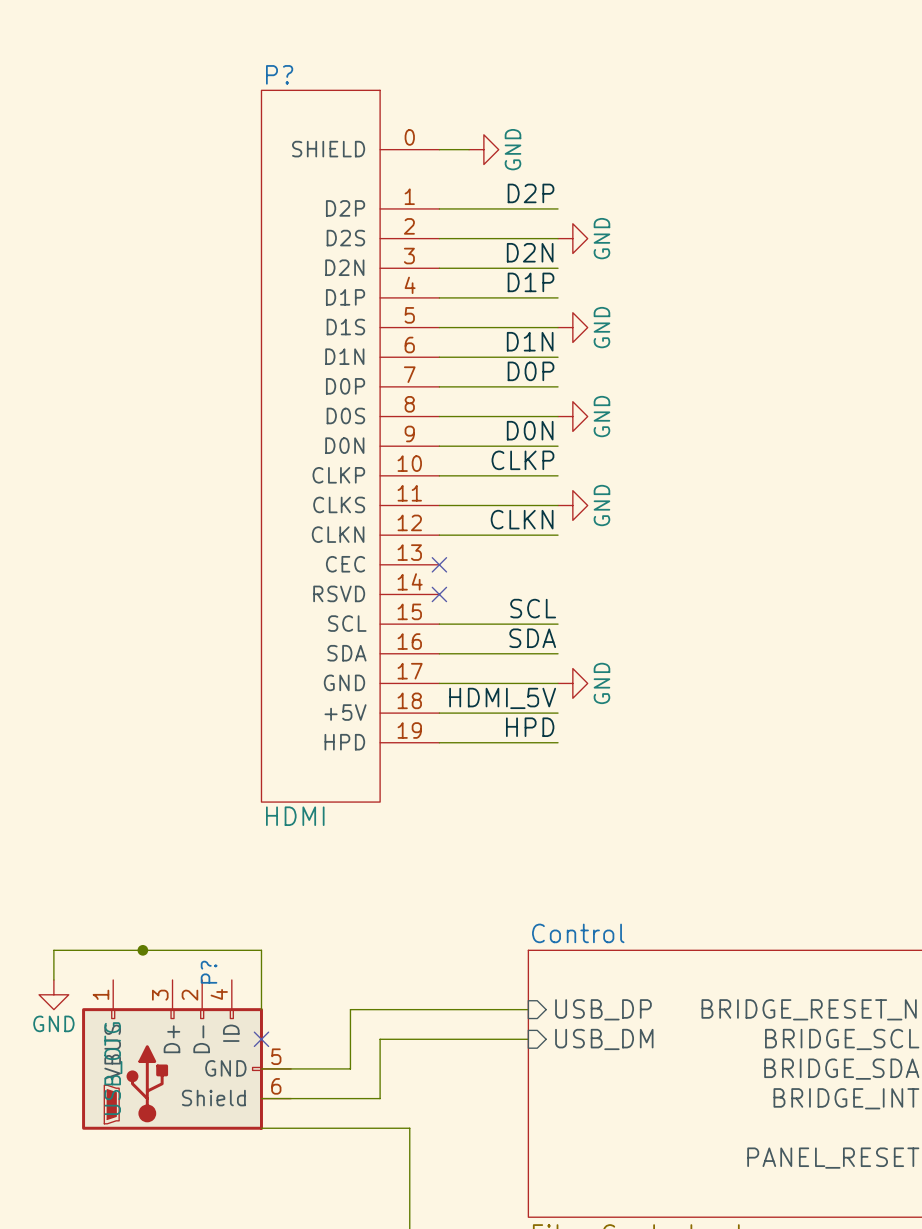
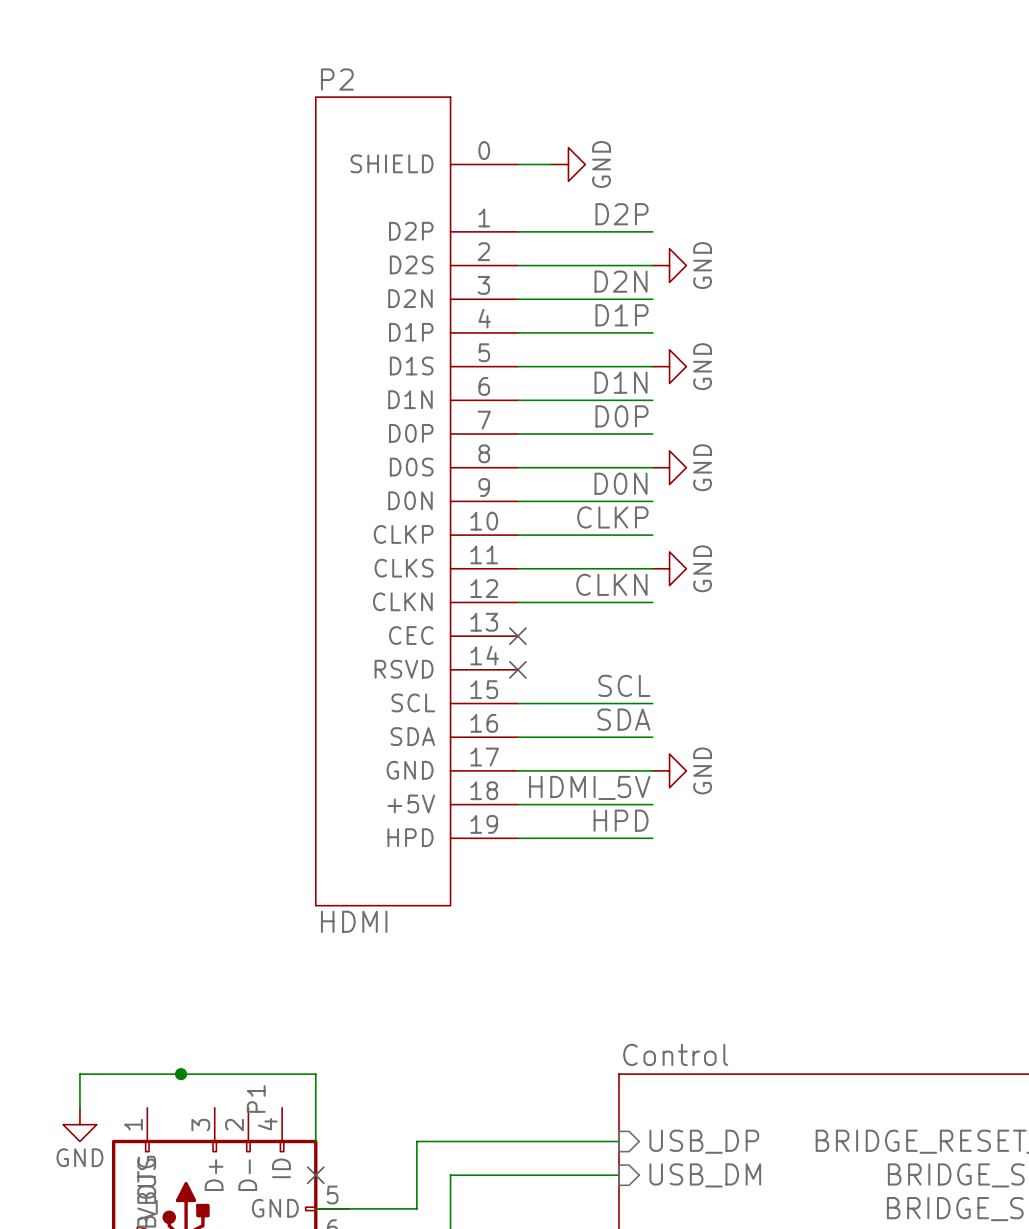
P? name: P? (279, 74) -> P2 (337, 79)
P? name: P? (209, 972) -> P1 (256, 1099)

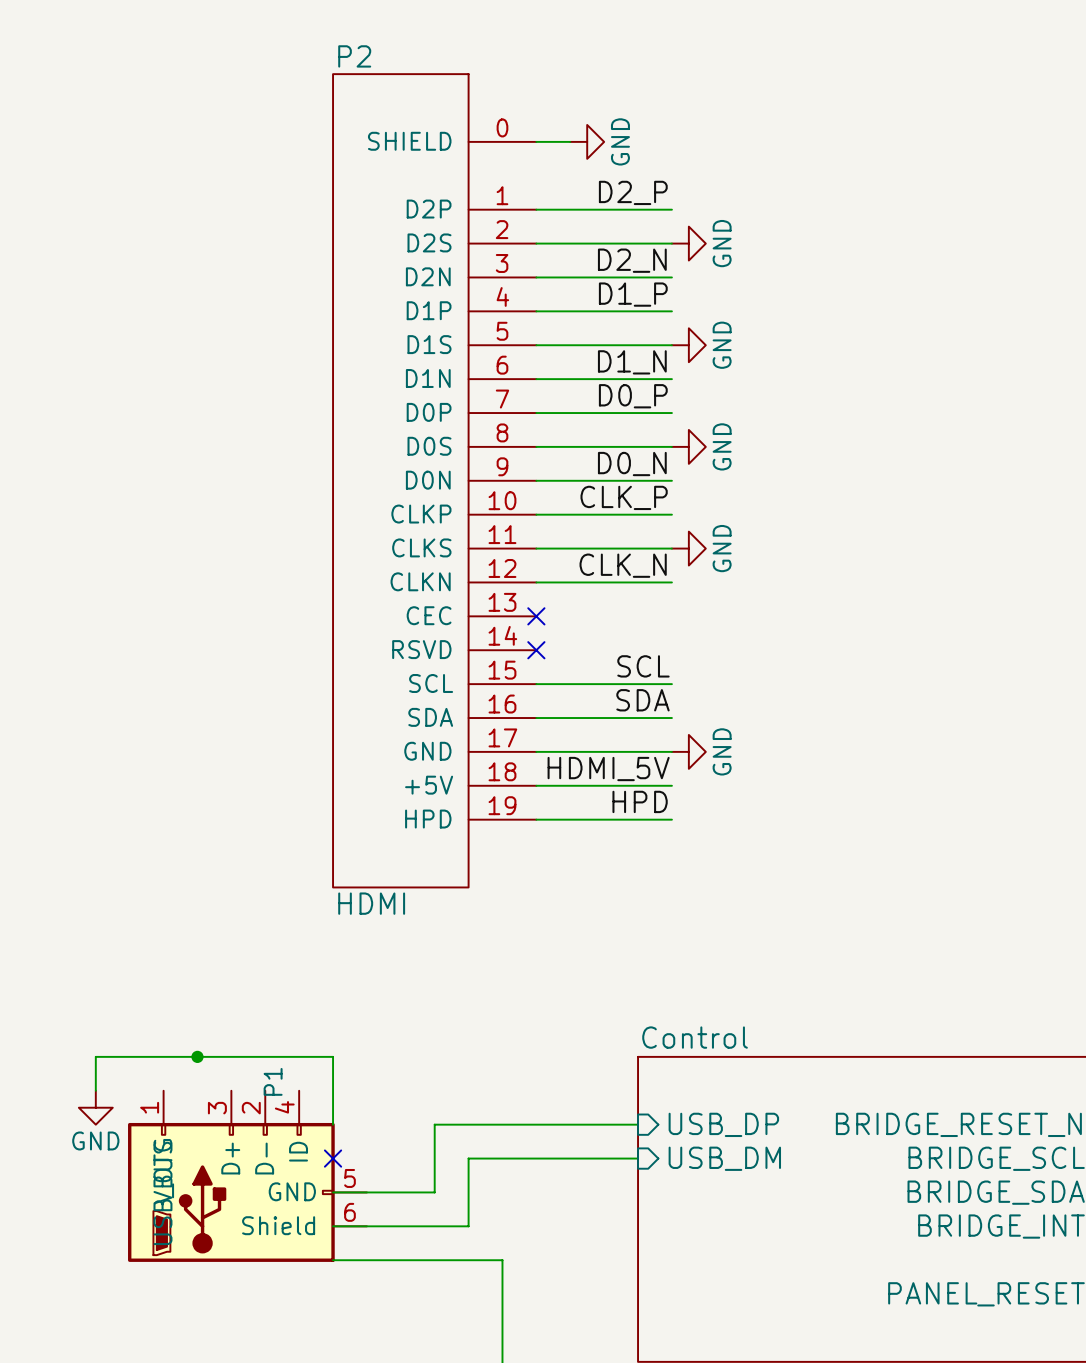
label: D2P (622, 214) -> D2_P (633, 192)
label: D2N (621, 281) -> D2_N (632, 260)
label: D1P (622, 315) -> D1_P (633, 294)
label: D1N (621, 382) -> D1_N (632, 362)
label: D0P (622, 416) -> D0_P (633, 396)
label: D0N (621, 483) -> D0_N (632, 464)
label: CLKP (612, 517) -> CLK_P (624, 497)
label: CLKN (611, 584) -> CLK_N (623, 565)

